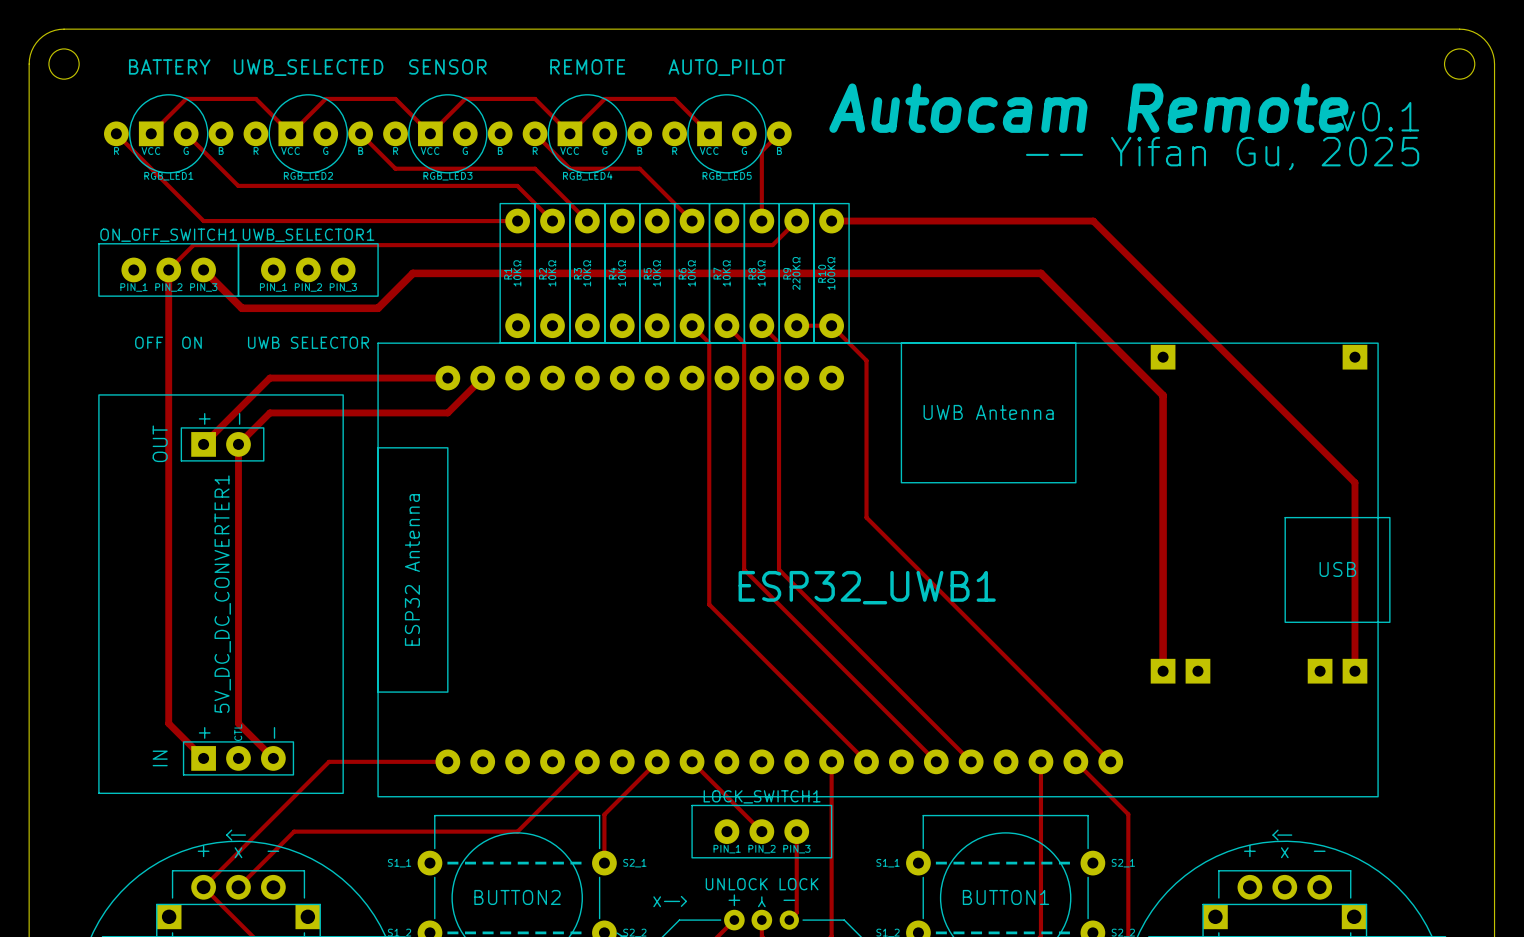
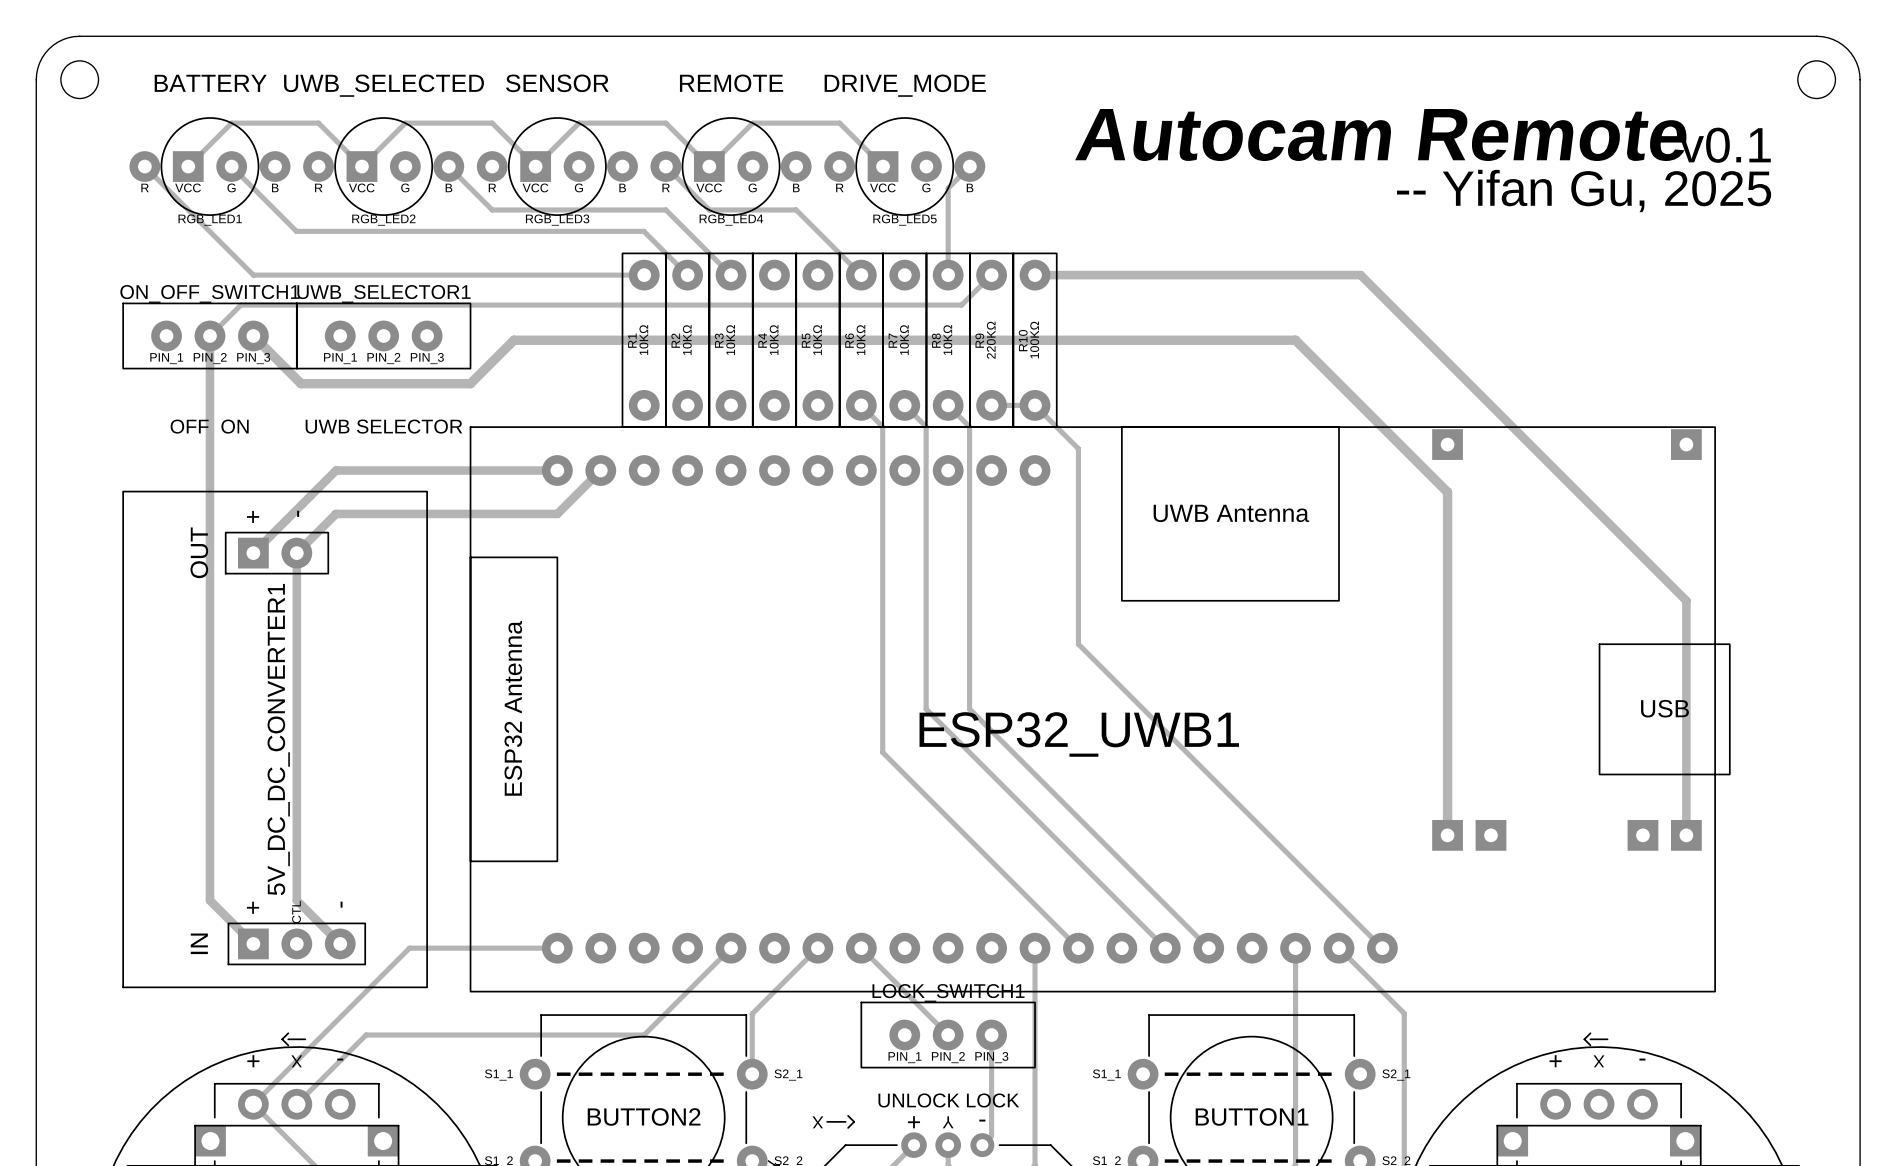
RGB_LED5 value: AUTO_PILOT (726, 67) -> DRIVE_MODE (905, 85)

